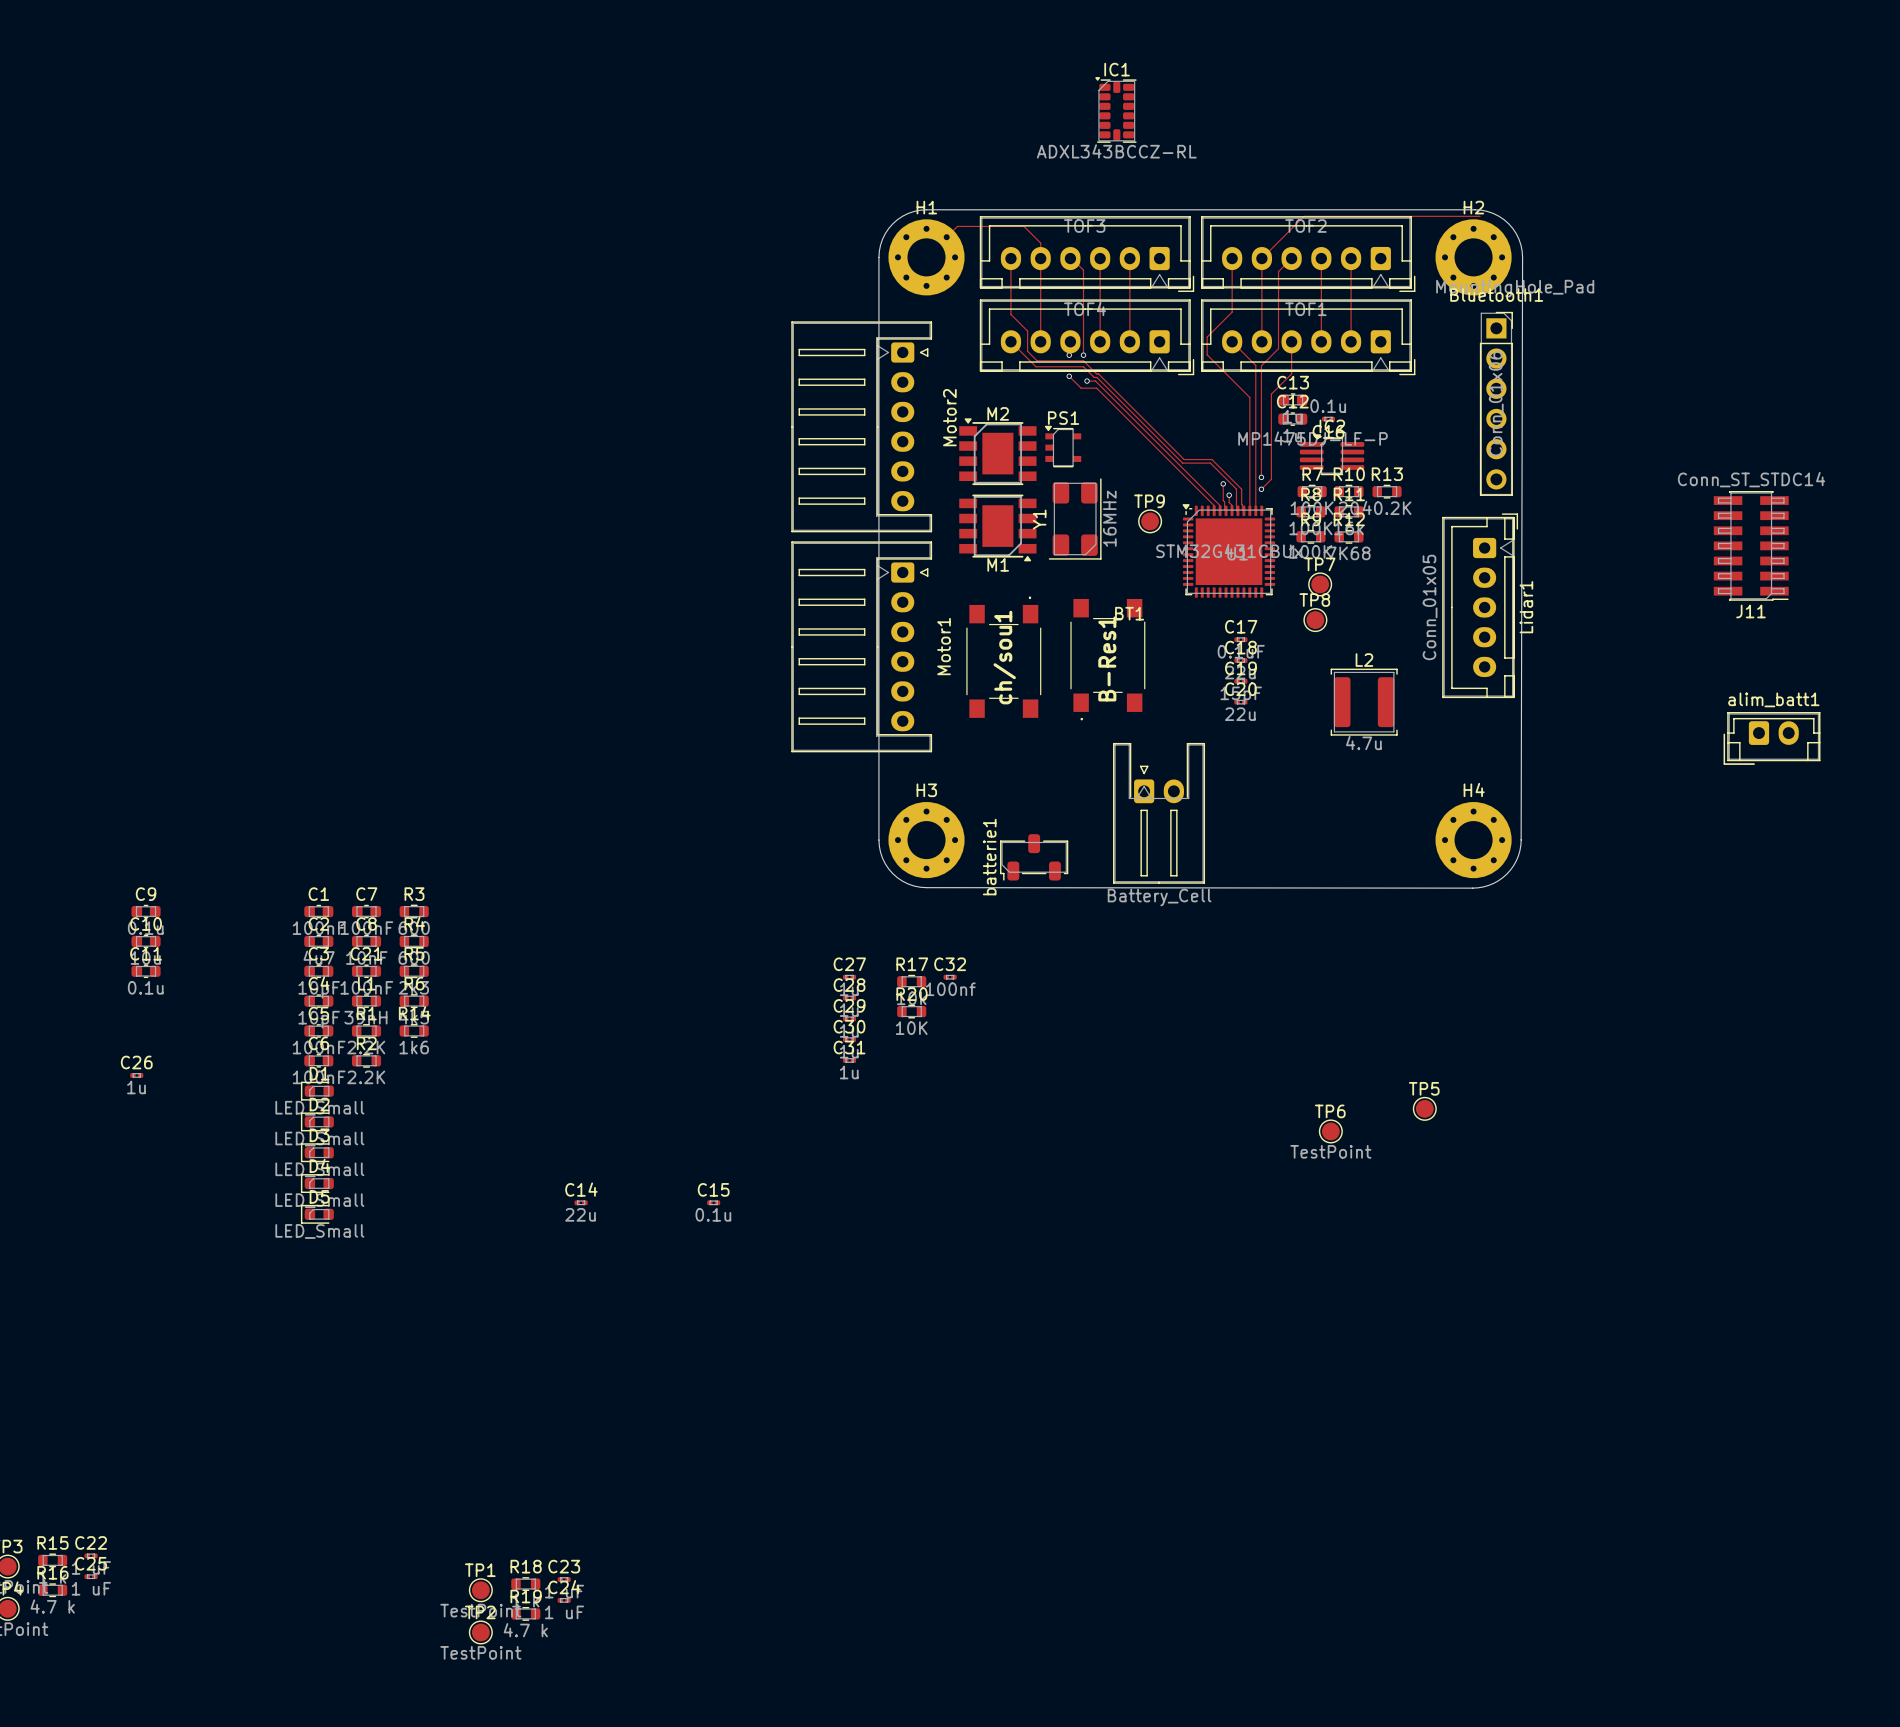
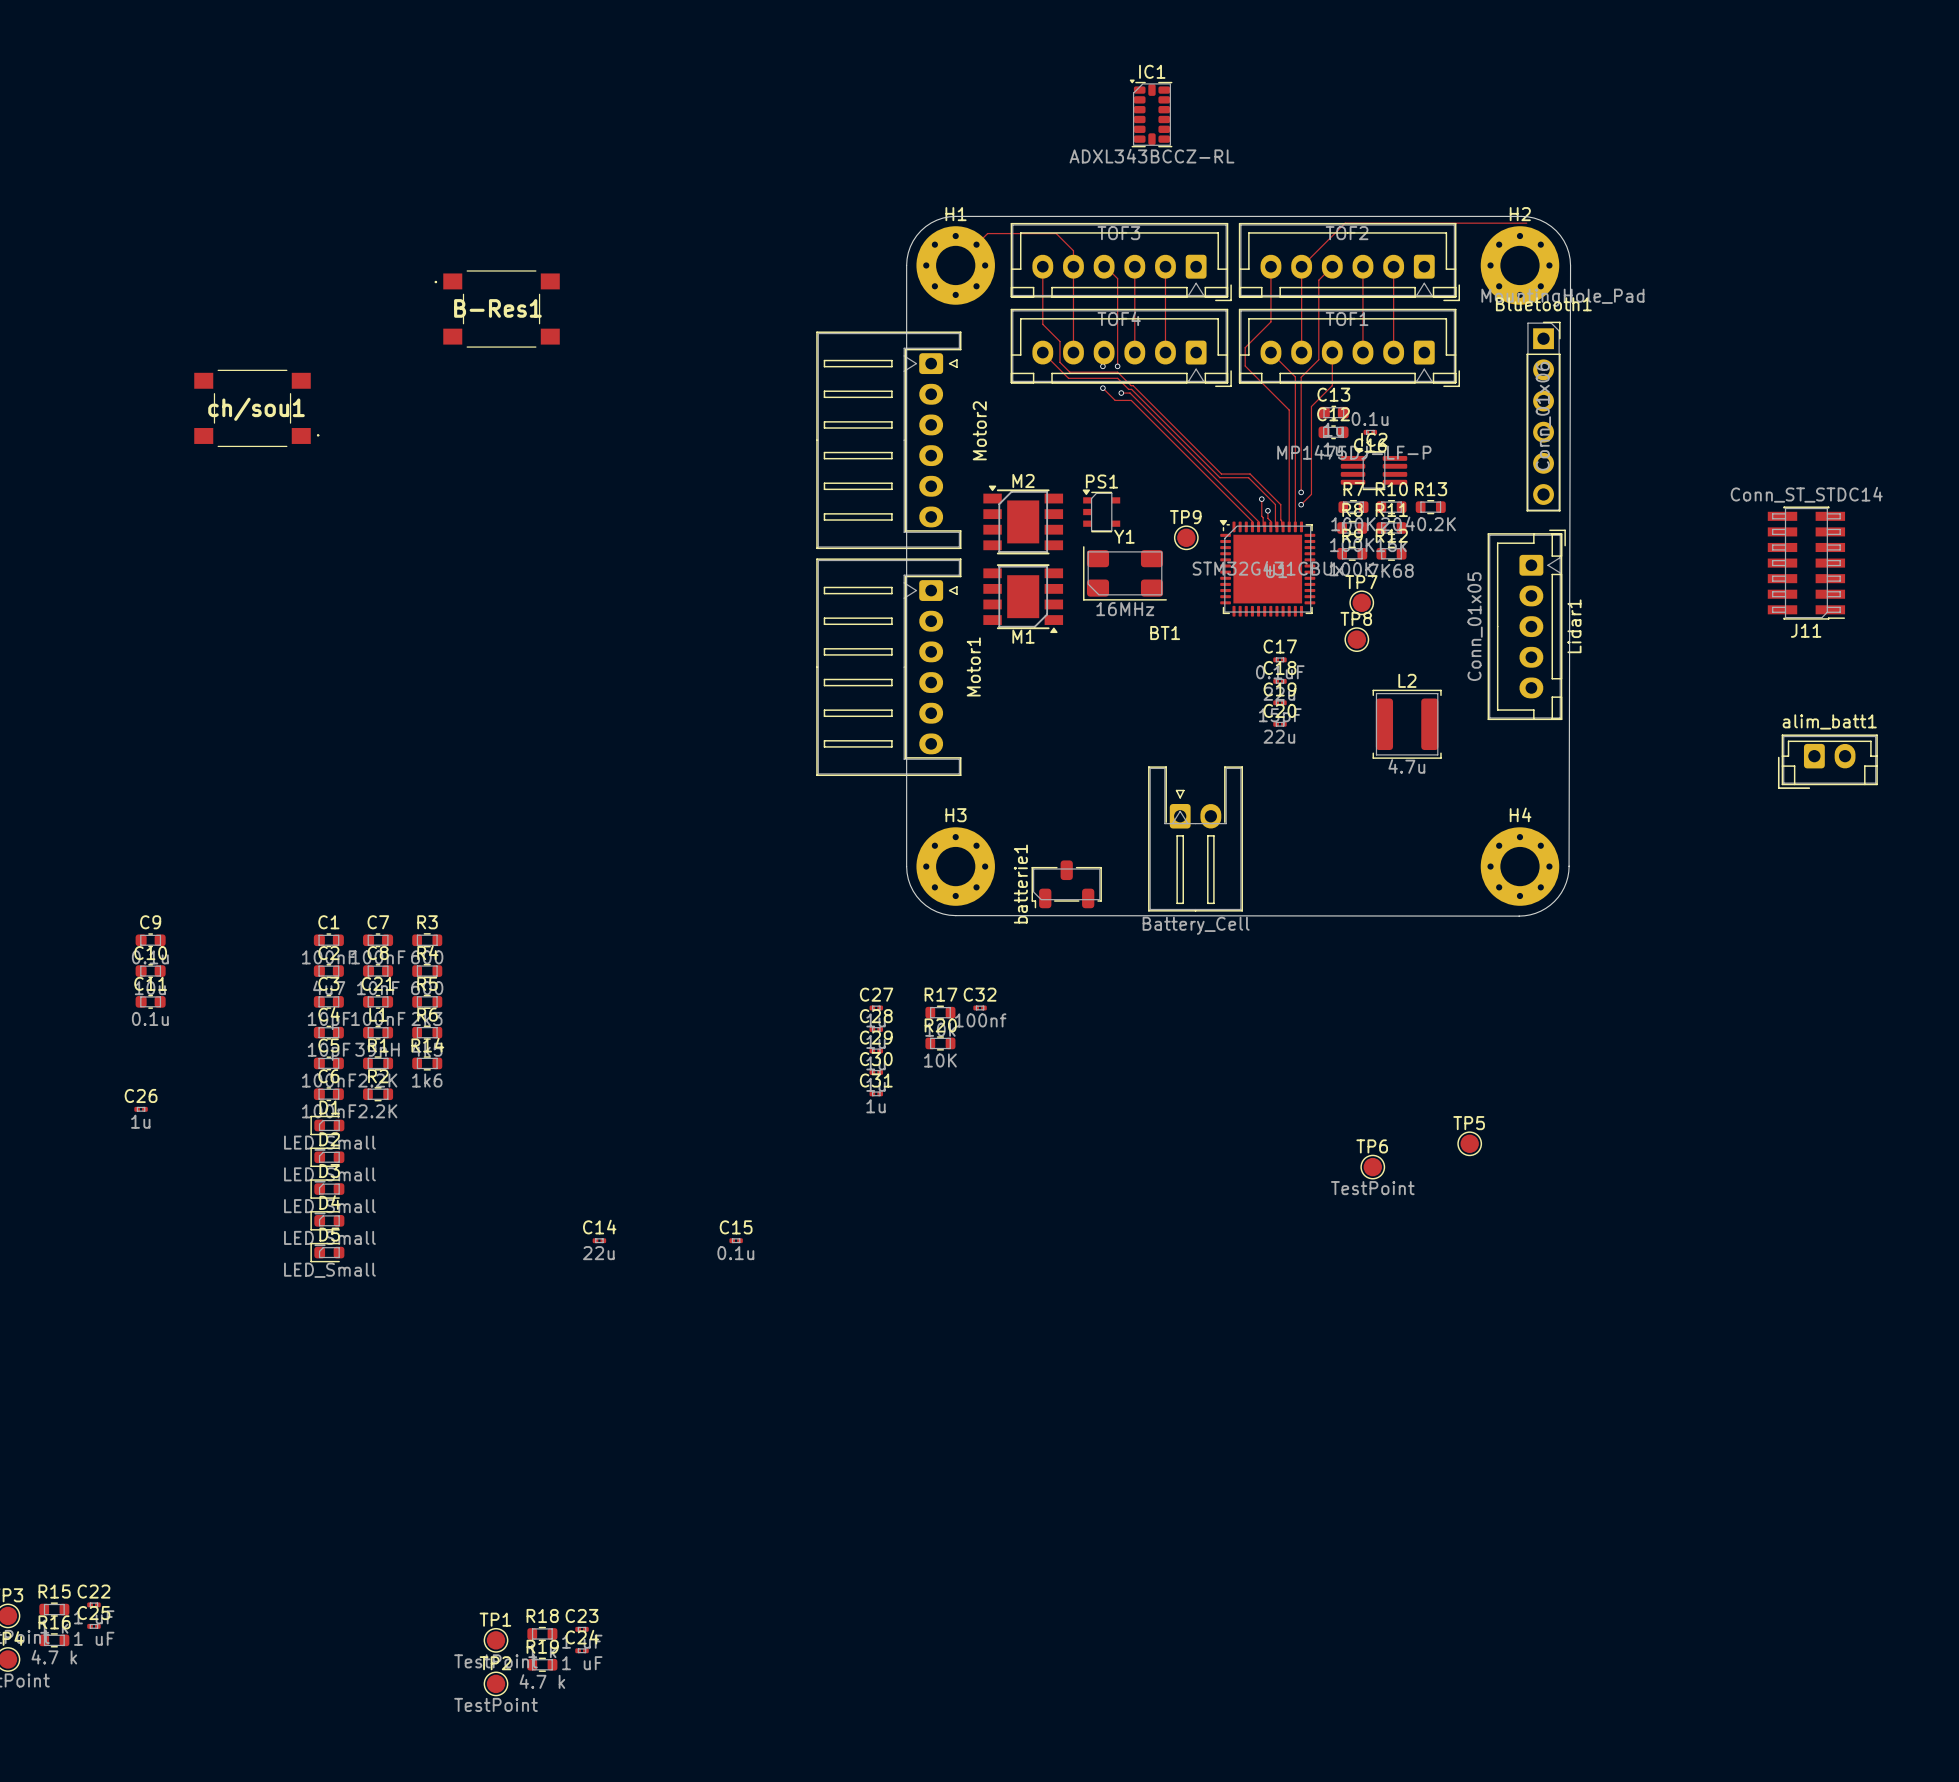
PS1 position: (1063, 446) -> (1101, 510)
M2 position: (997, 451) -> (1023, 519)
Y1 rotation: 0° (1075, 518) -> 90° clockwise (1124, 573)
M1 position: (997, 527) -> (1023, 598)
ch/sou1 rotation: 0° (1003, 657) -> 90° clockwise (256, 408)
ch/sou1 position: (1003, 657) -> (256, 408)
B-Res1 rotation: 0° (1107, 659) -> 90° clockwise (497, 309)
B-Res1 position: (1107, 659) -> (497, 309)

